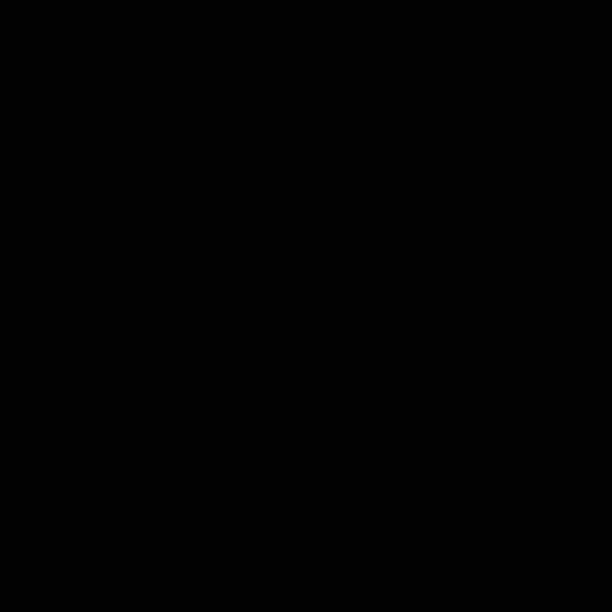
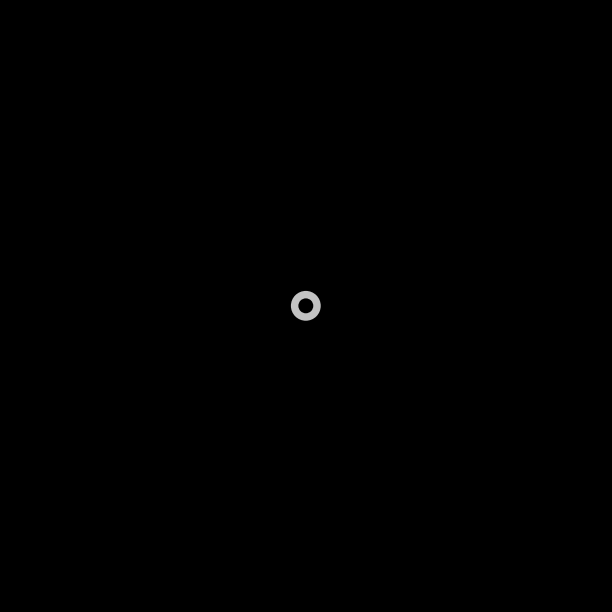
via: none -> (305, 305)

